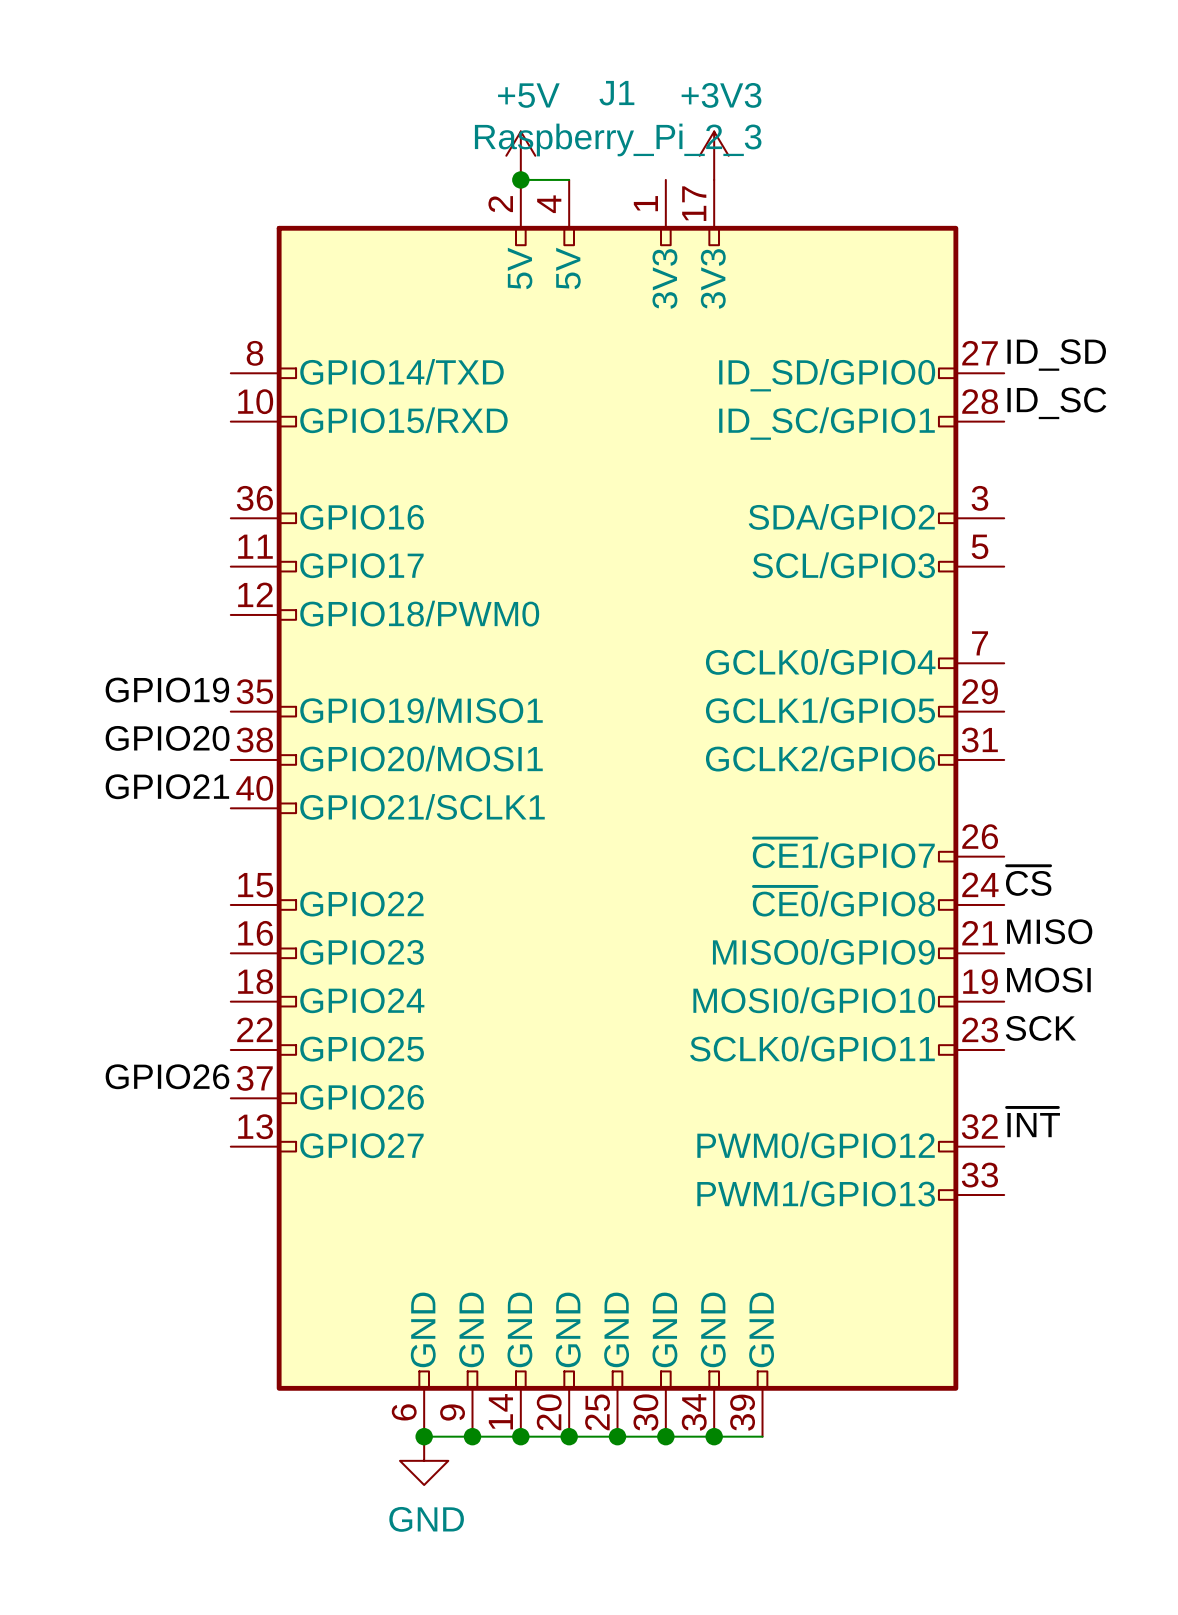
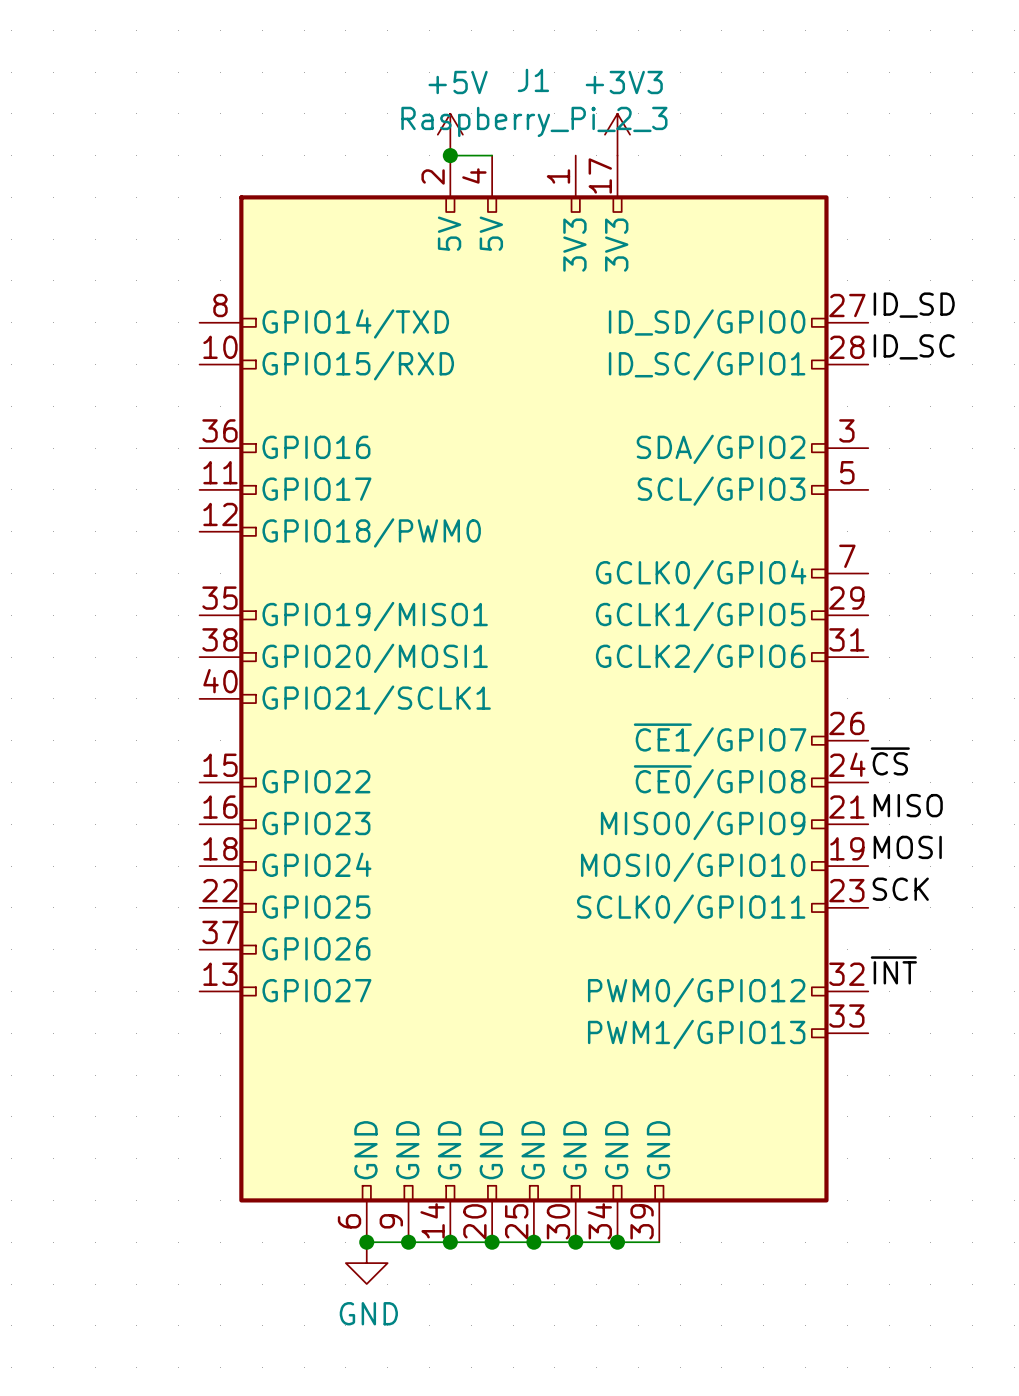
label: GPIO19 (167, 690) -> none
label: GPIO20 (167, 738) -> none
label: GPIO21 (167, 786) -> none
label: GPIO26 (167, 1076) -> none

